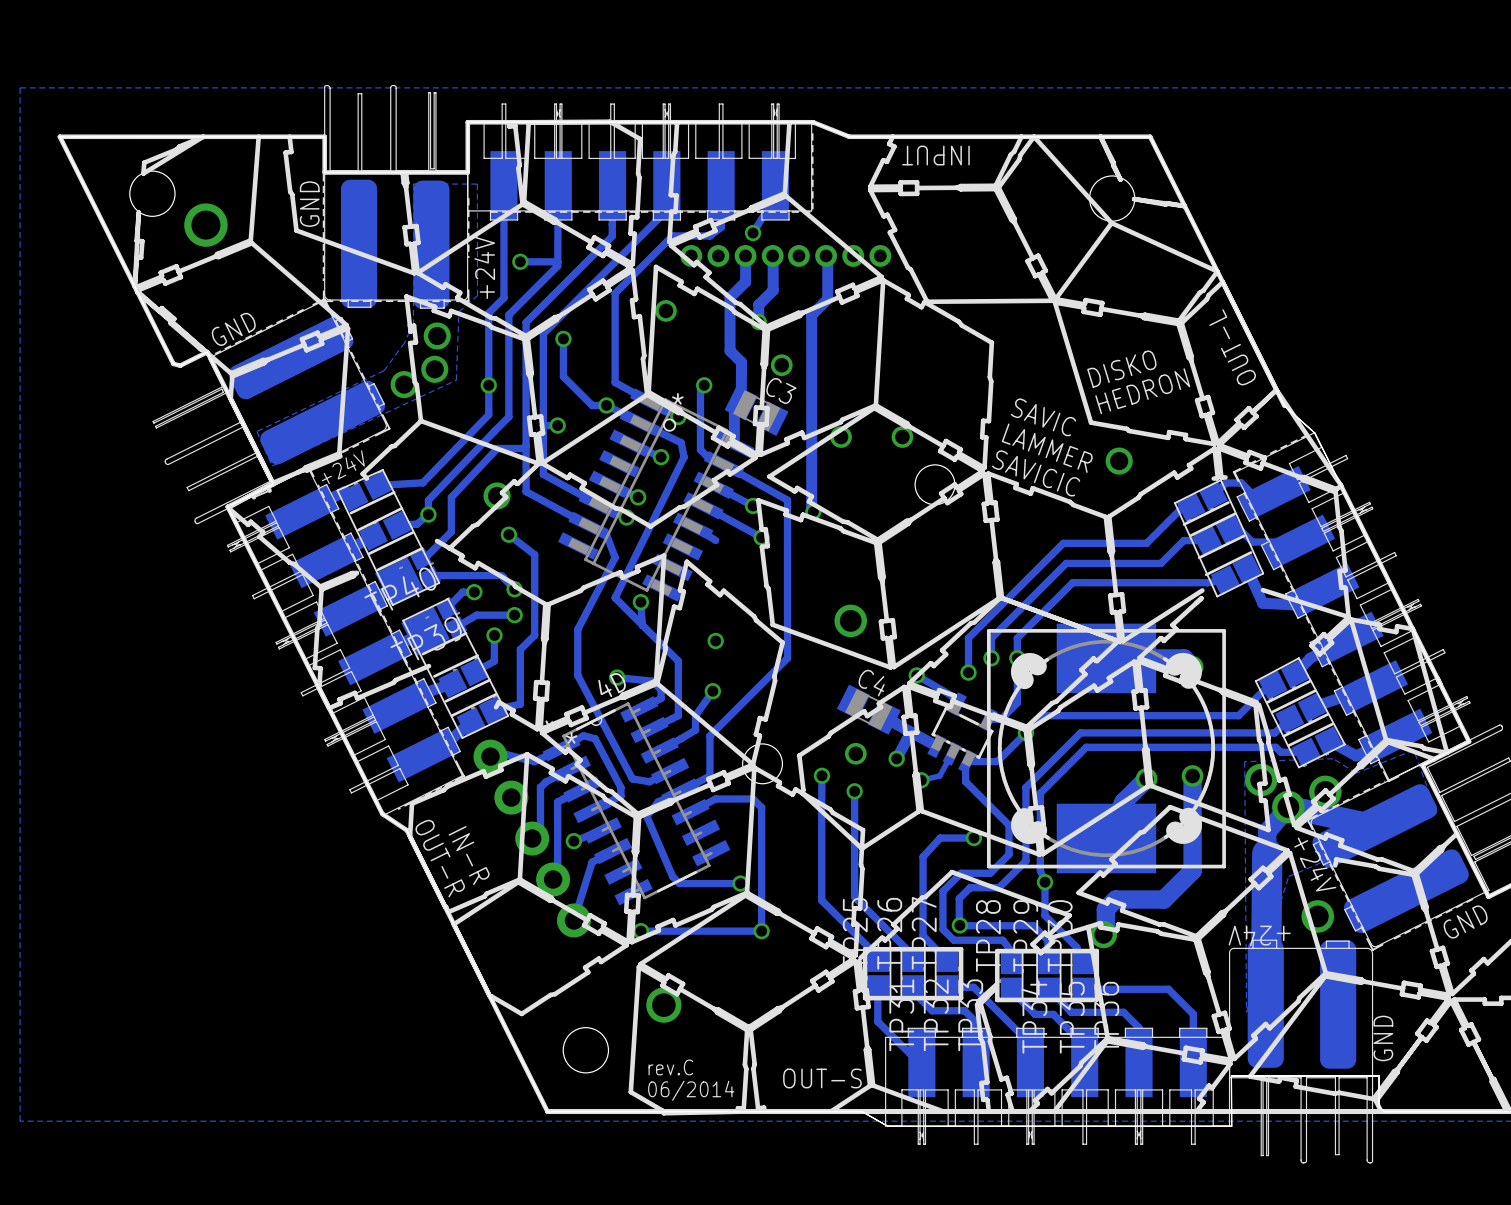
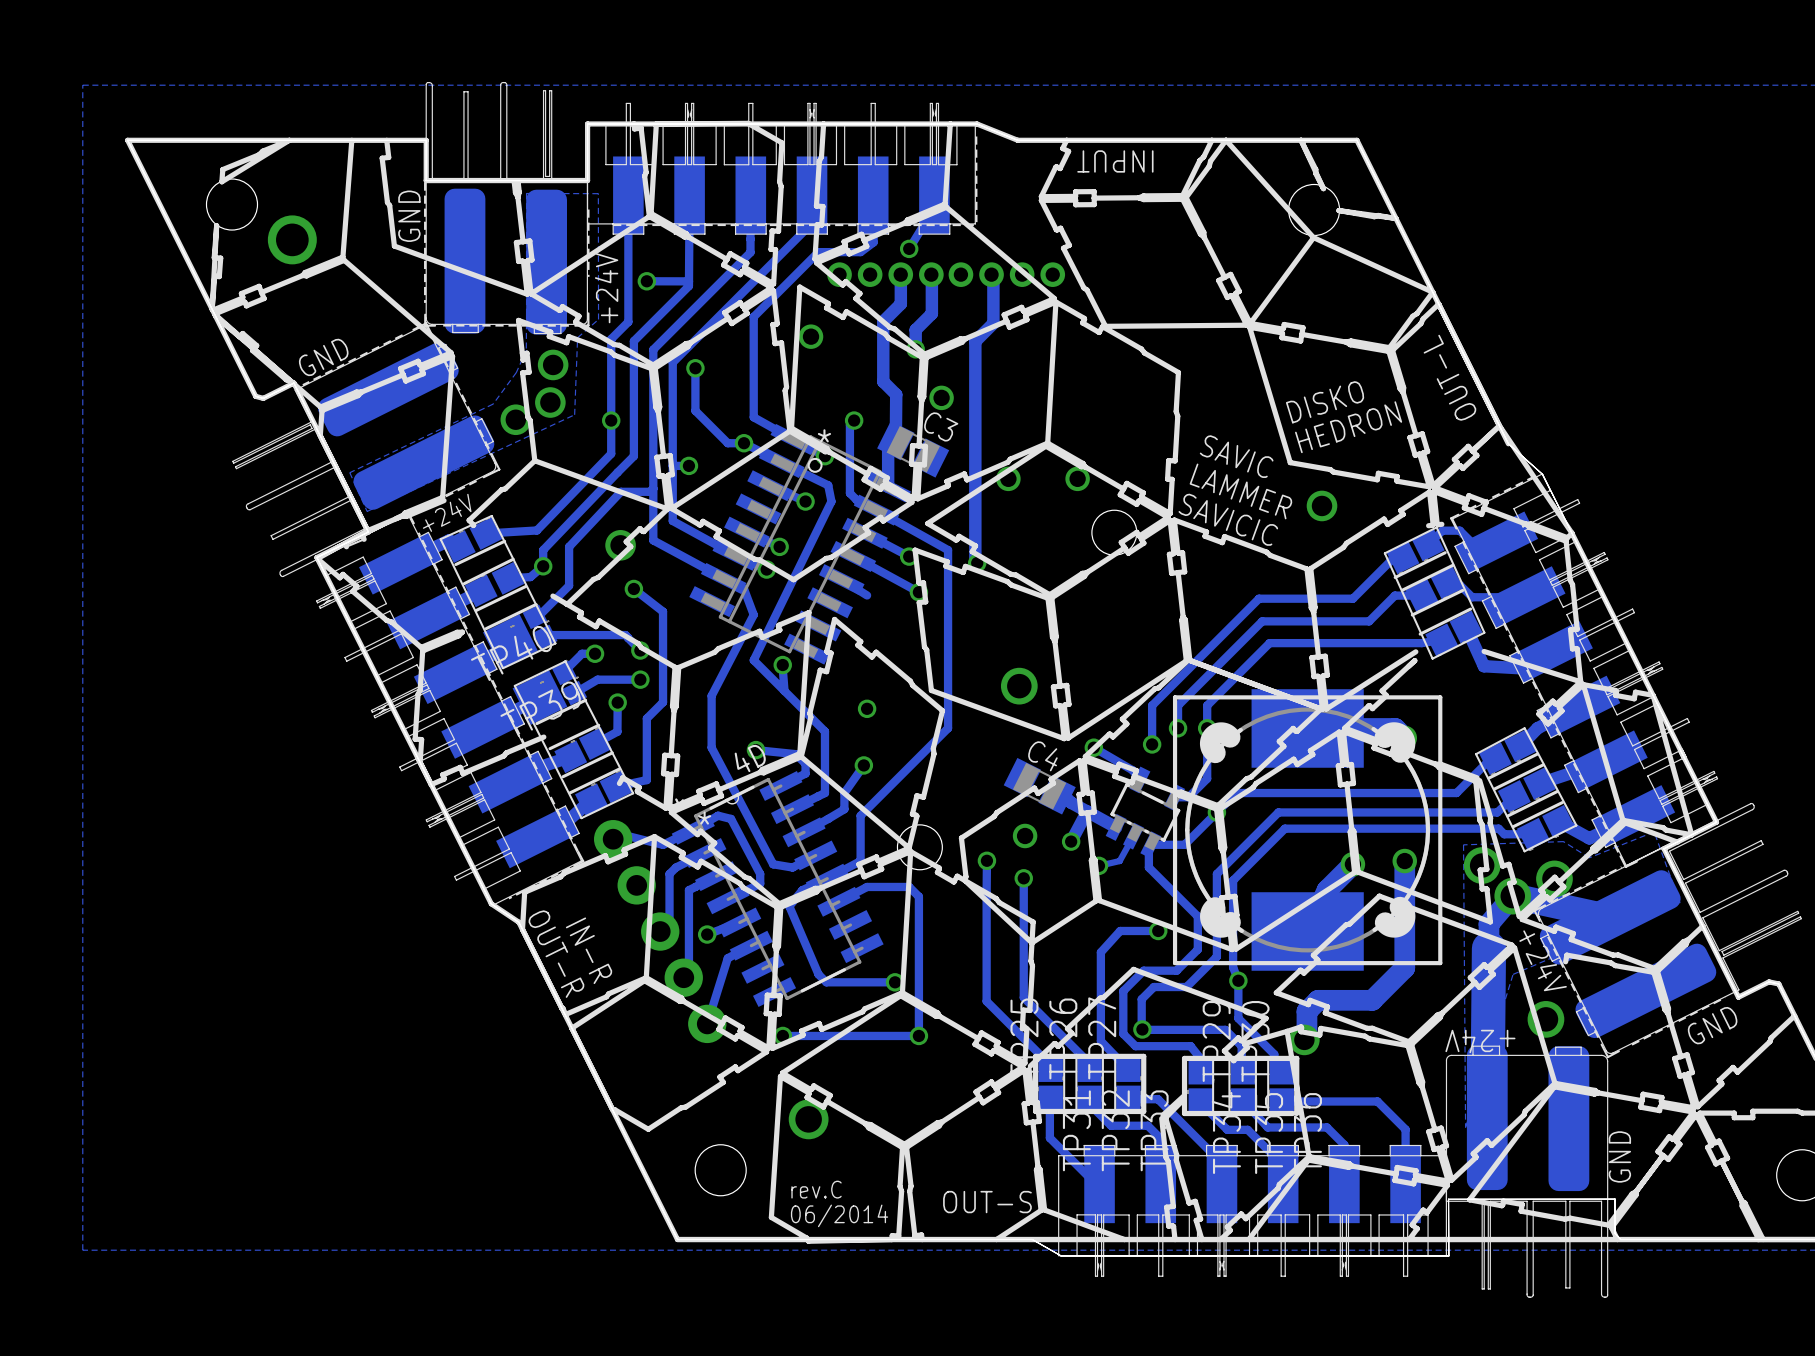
TP28 name: TP28 (988, 936) -> none

